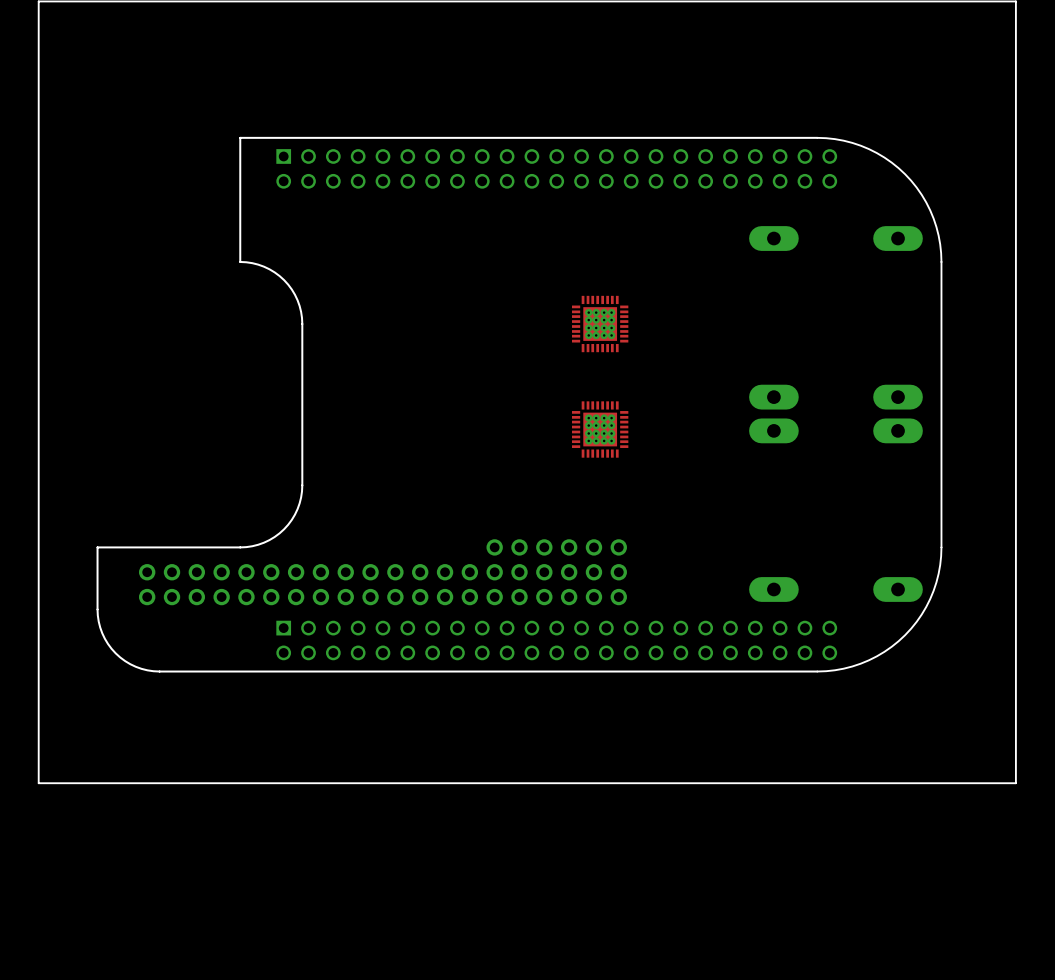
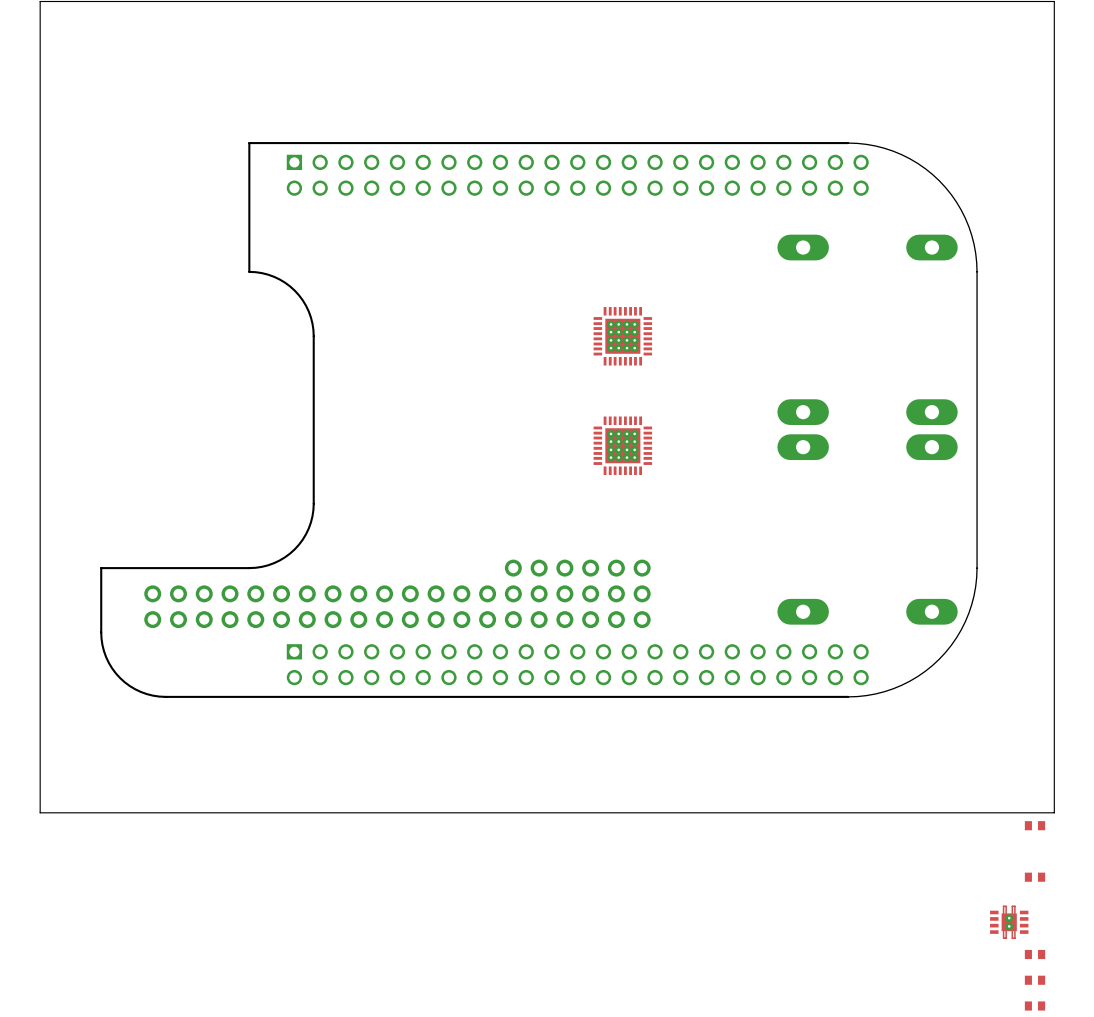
part: none -> (1034, 825)
part: none -> (1034, 877)
part: none -> (1009, 922)
part: none -> (1034, 954)
part: none -> (1034, 980)
part: none -> (1034, 1006)

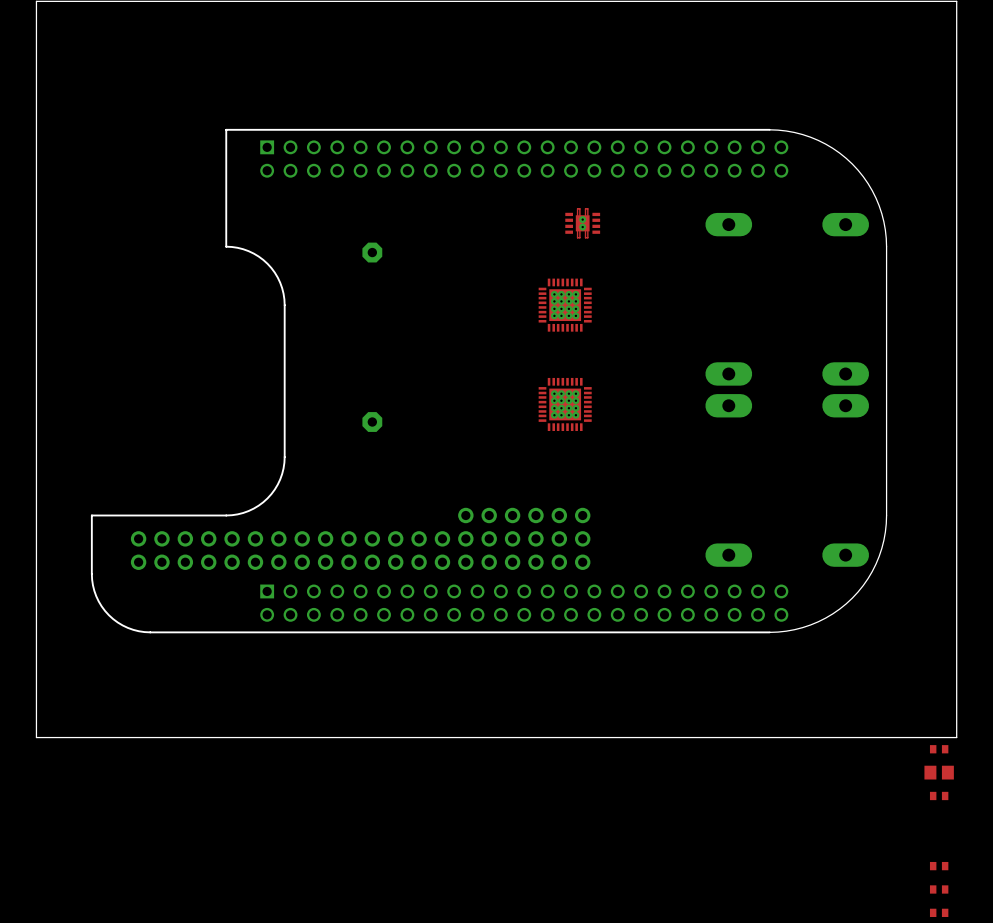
part: none -> (582, 223)
part: none -> (372, 252)
part: none -> (372, 422)
part: none -> (939, 772)
part: (1009, 922) -> none

